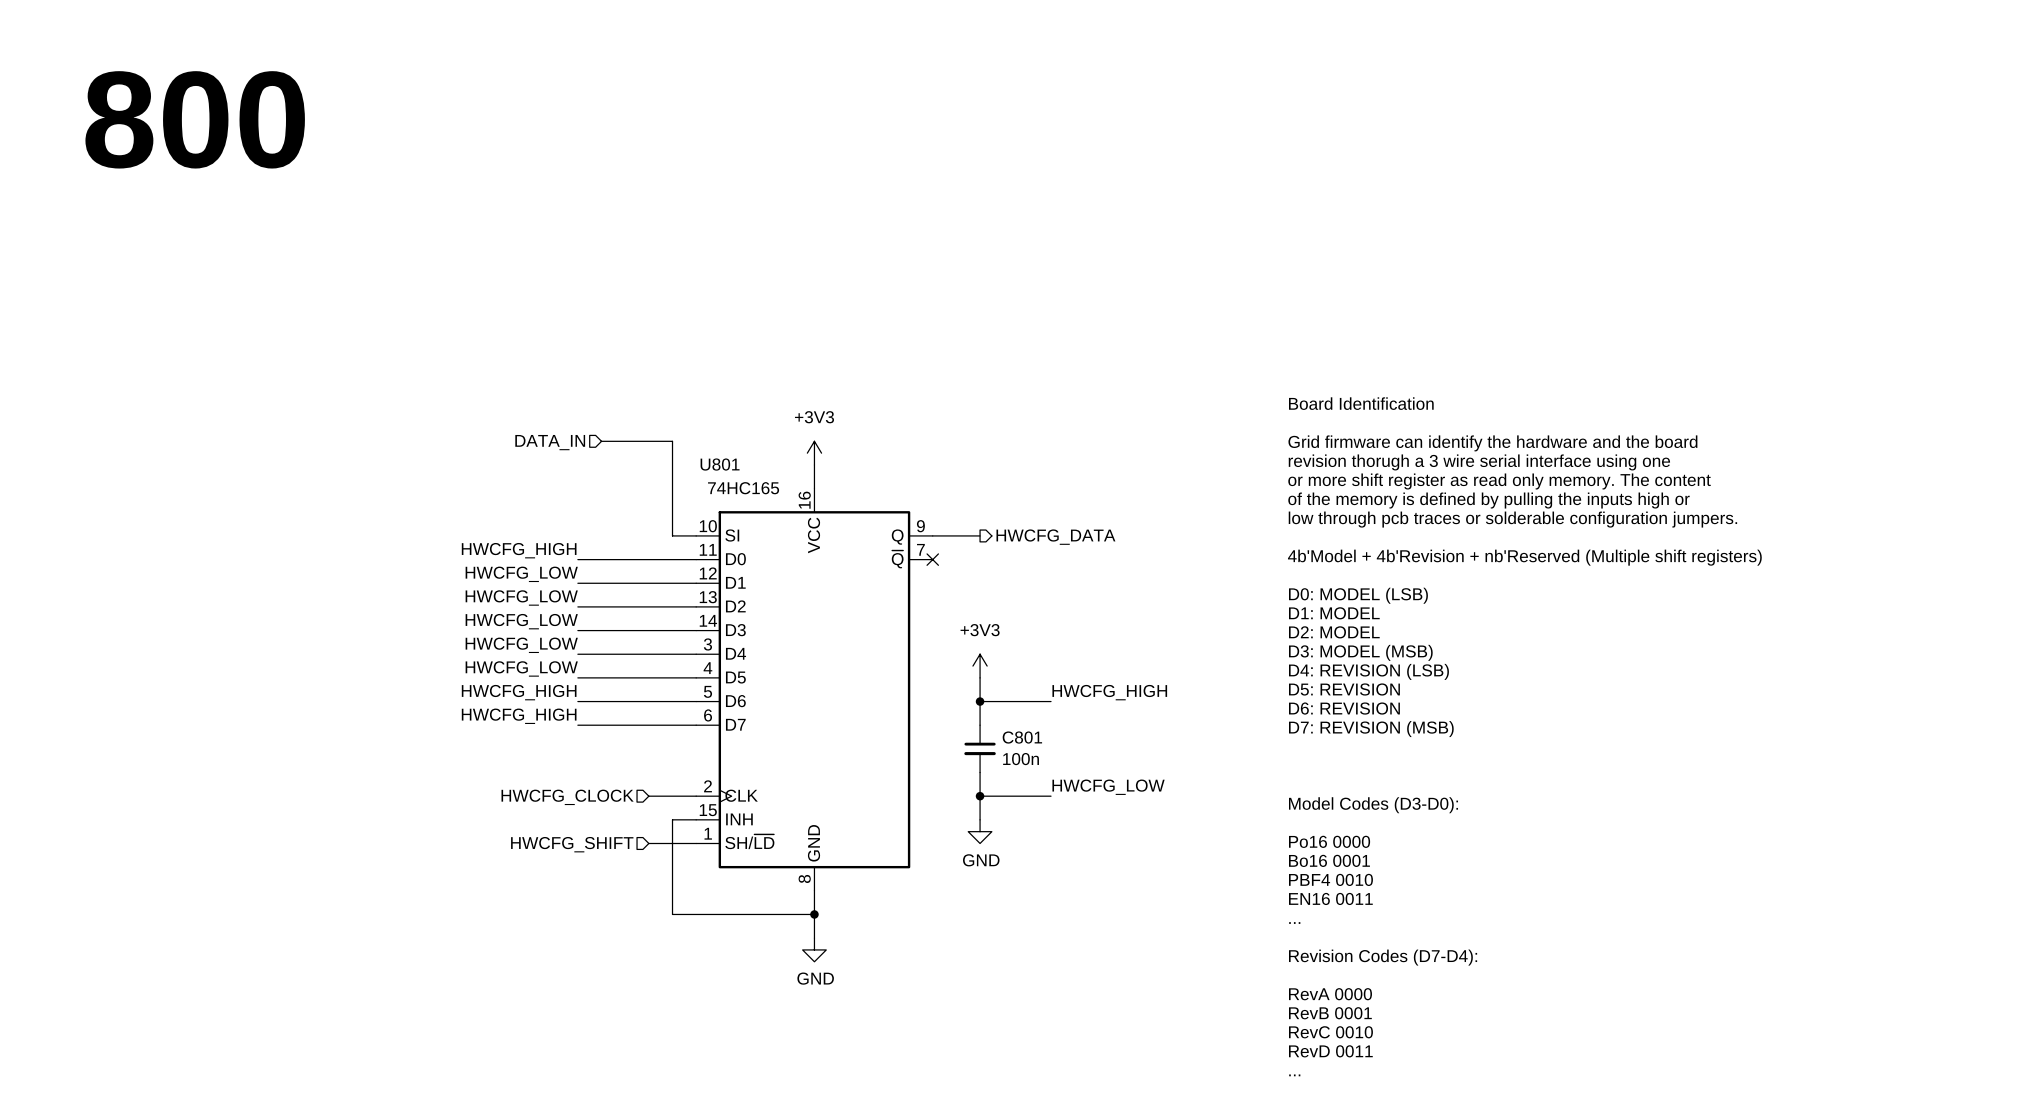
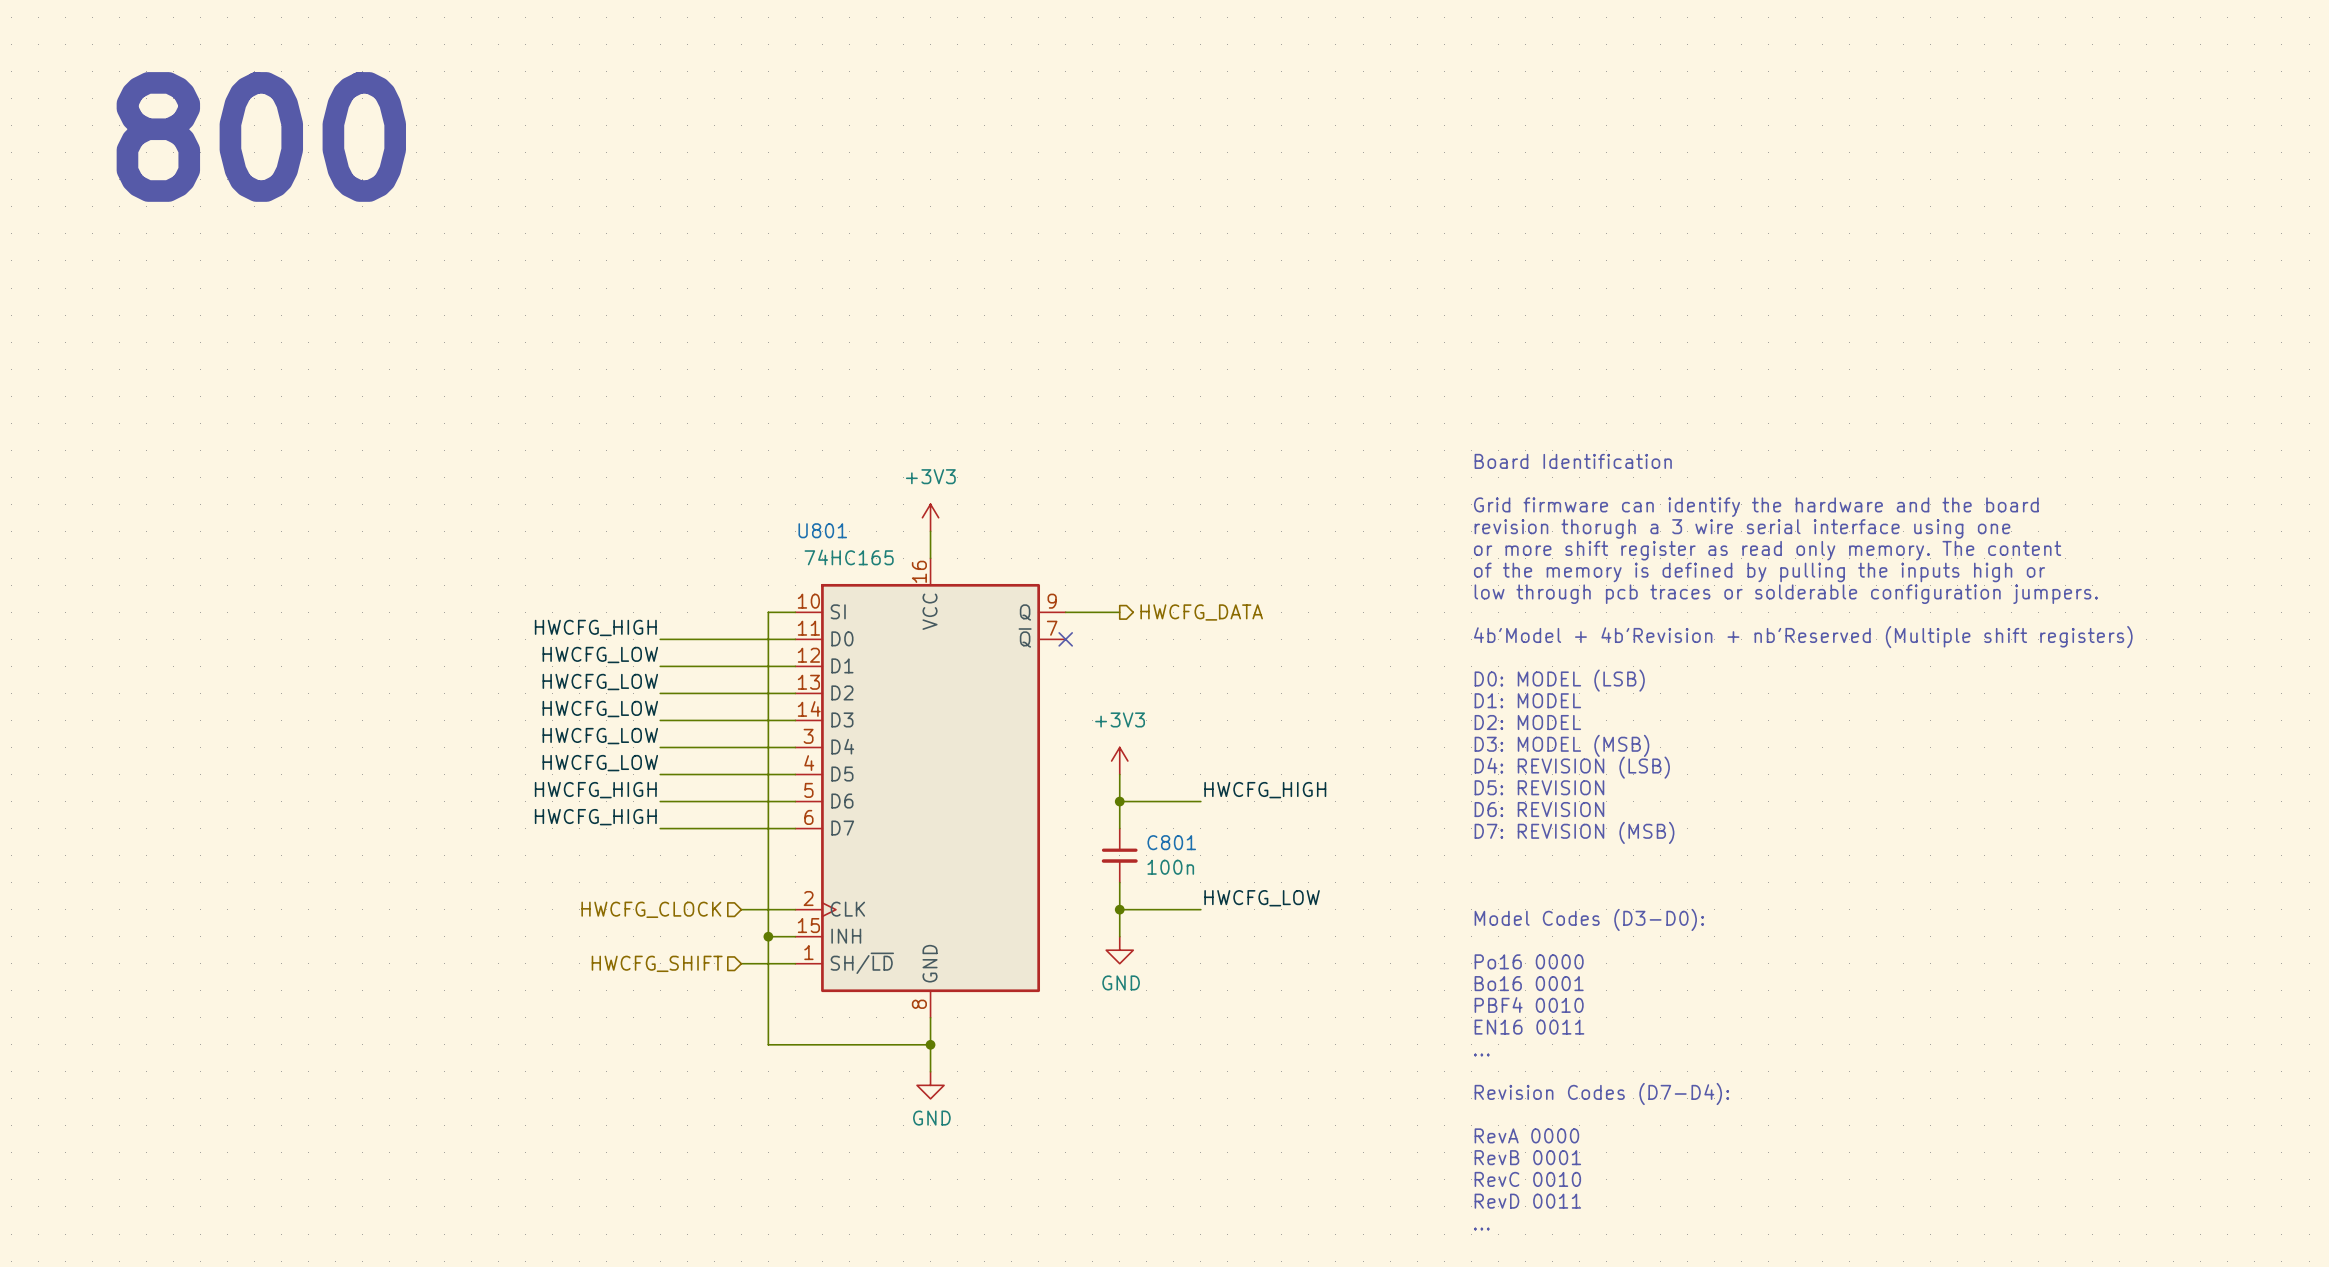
wire: (601, 441) (672, 441) (672, 535) -> (768, 936) (768, 612)
hierarchical label: DATA_IN (550, 442) -> none
junction: none -> (768, 936)

